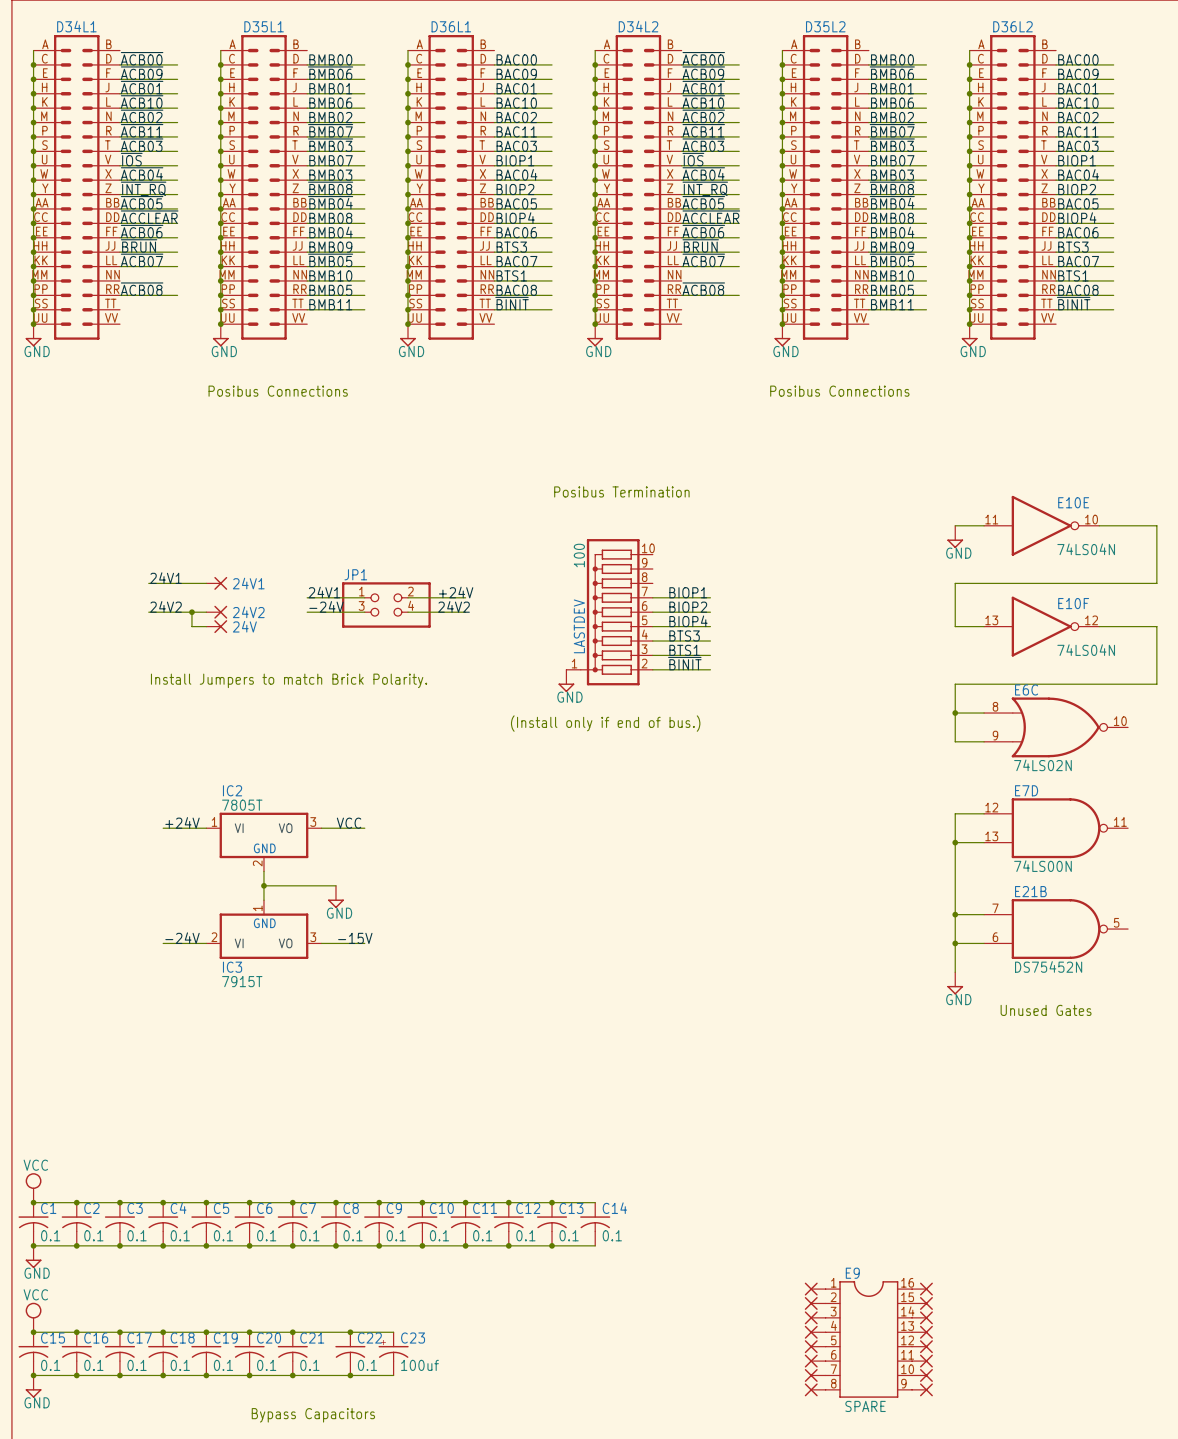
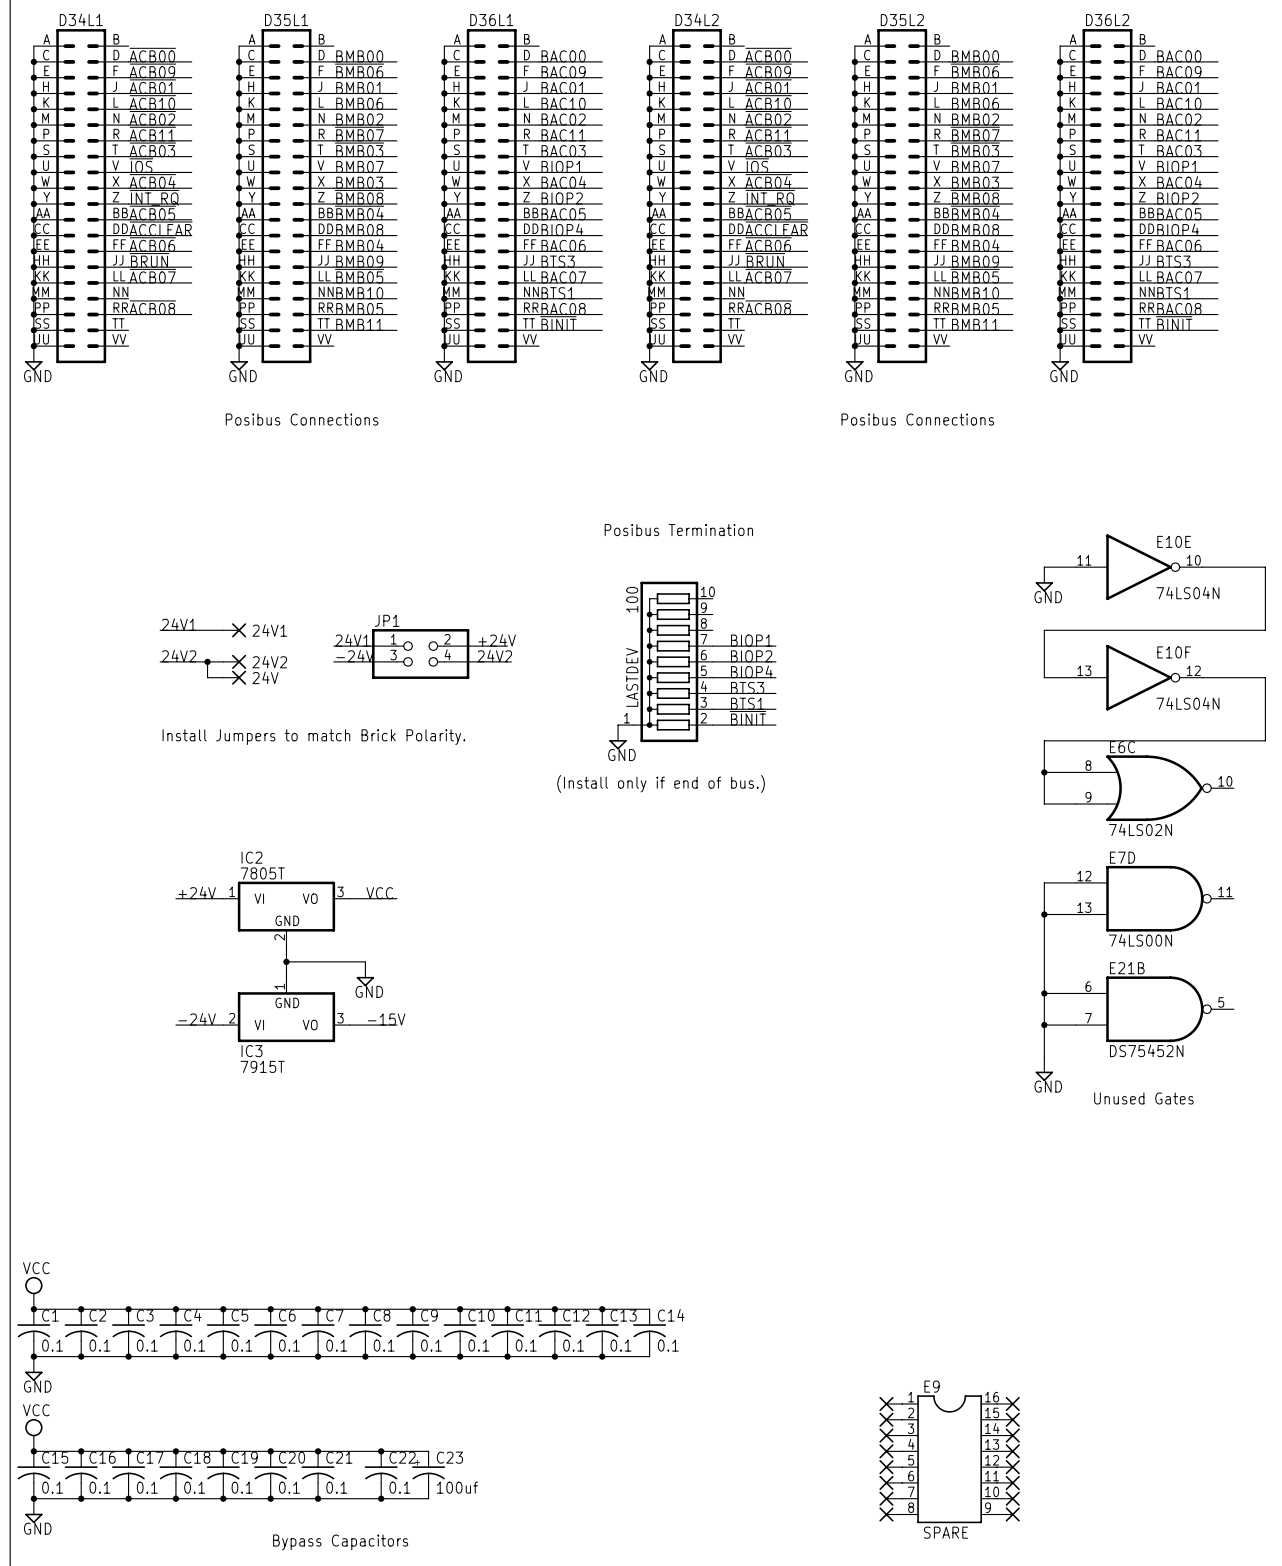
E21B flip: as is (1056, 929) -> up-down (1154, 1009)

